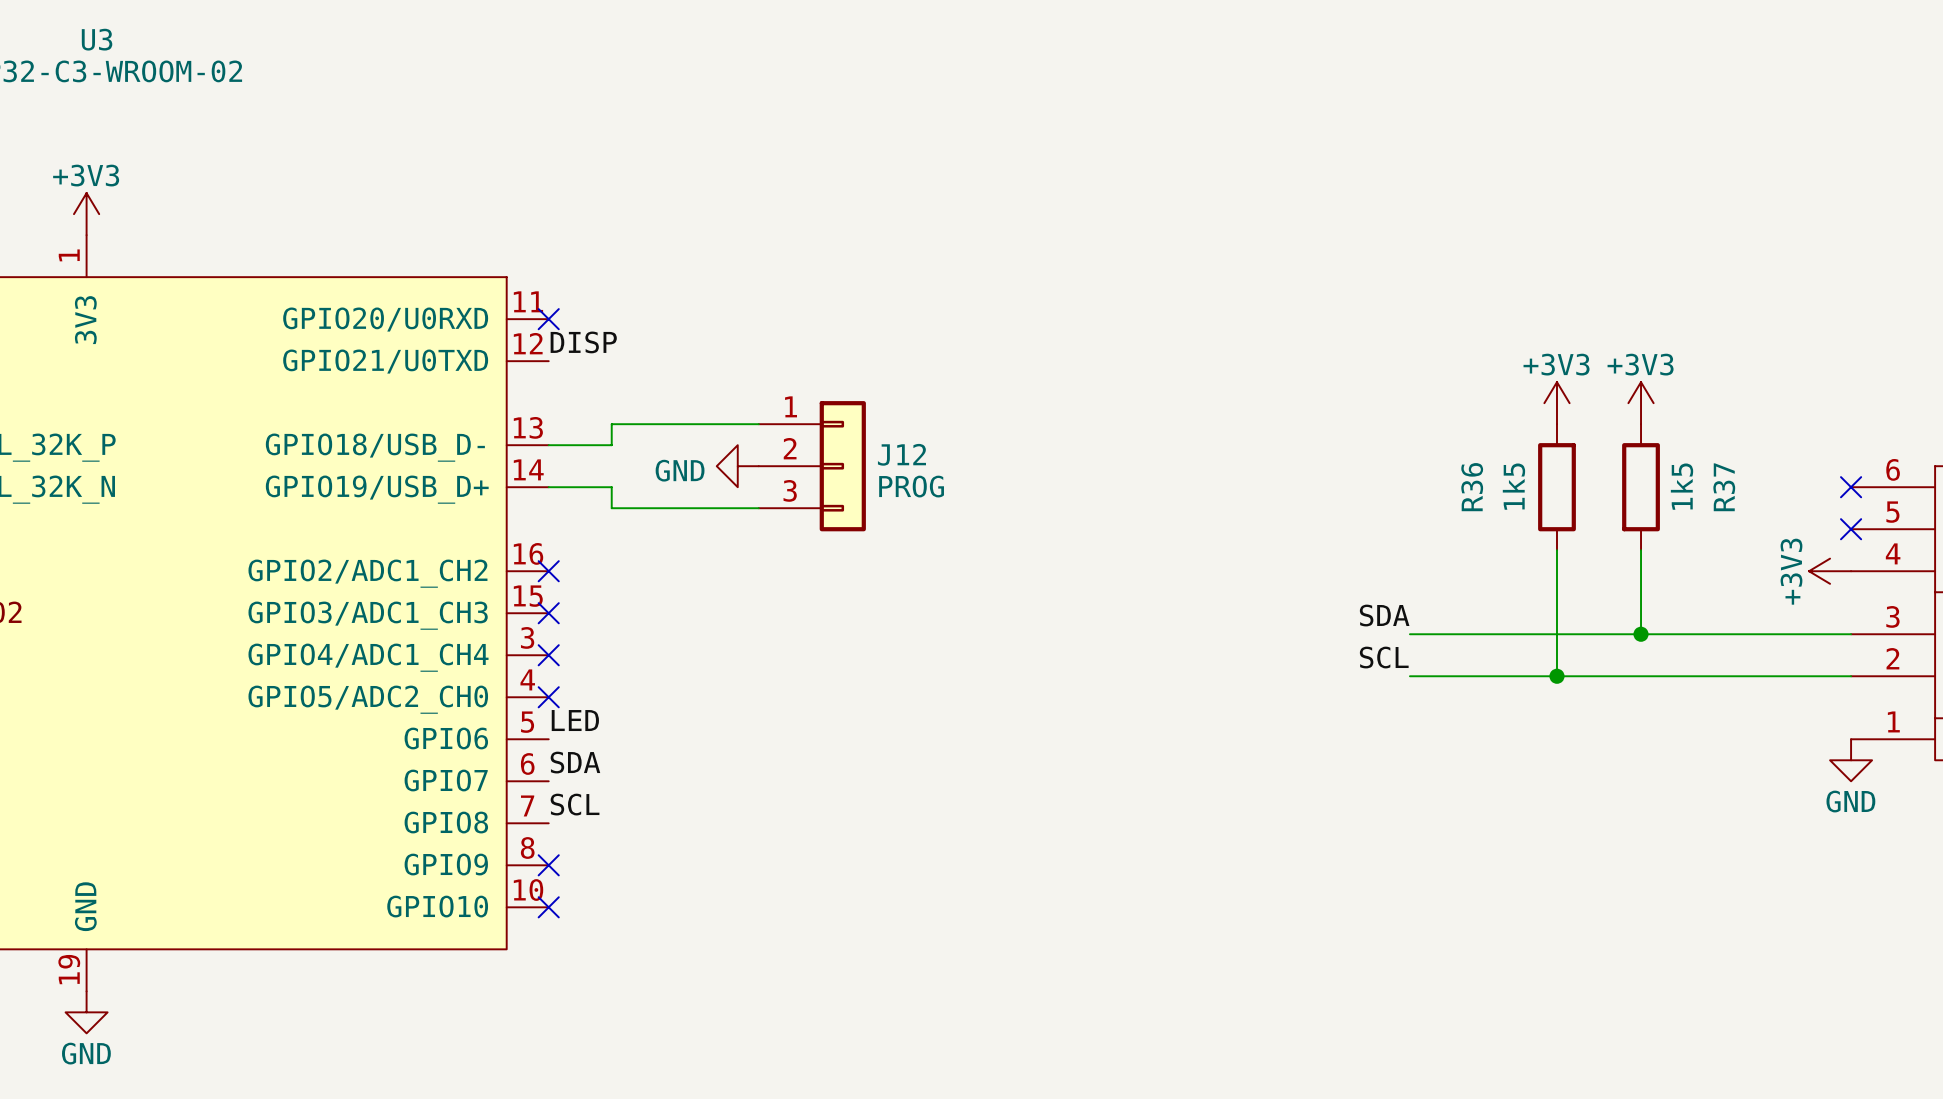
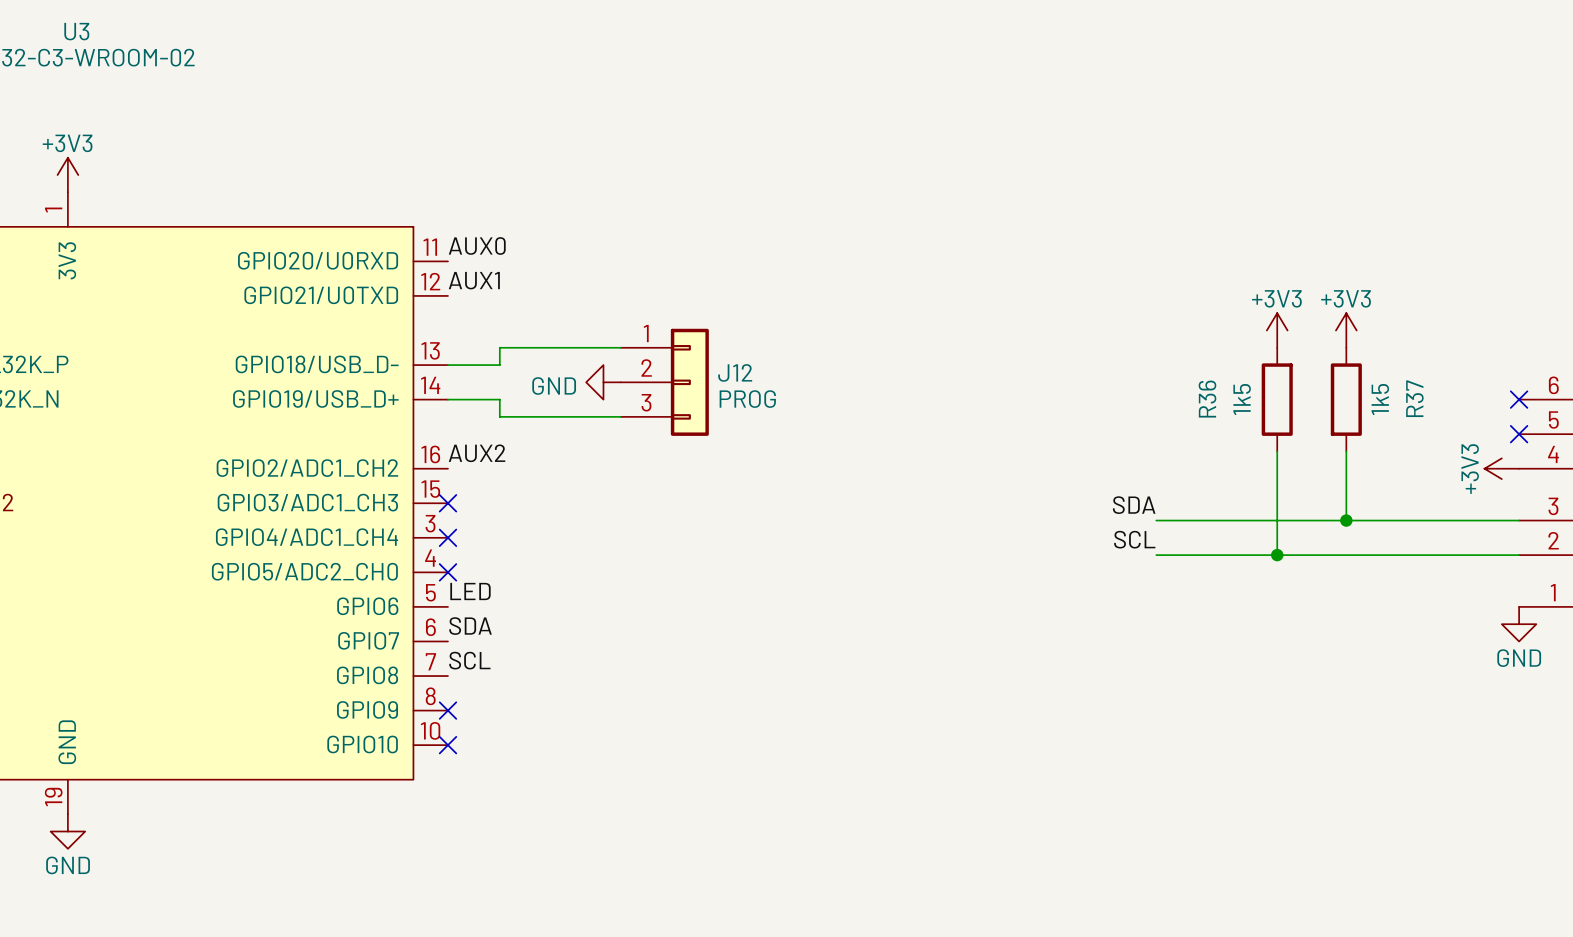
label: none -> AUX0 (477, 246)
no-connect mark: (548, 319) -> none
label: DISP (583, 342) -> AUX1 (474, 280)
label: none -> AUX2 (477, 453)
no-connect mark: (548, 571) -> none

